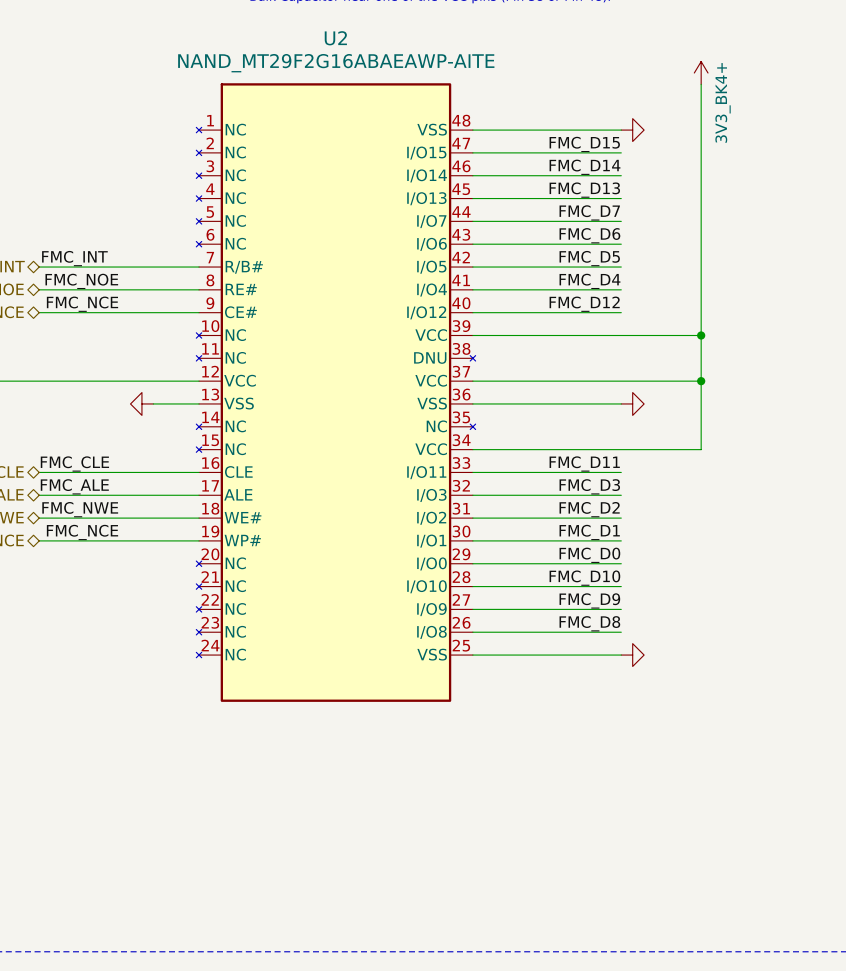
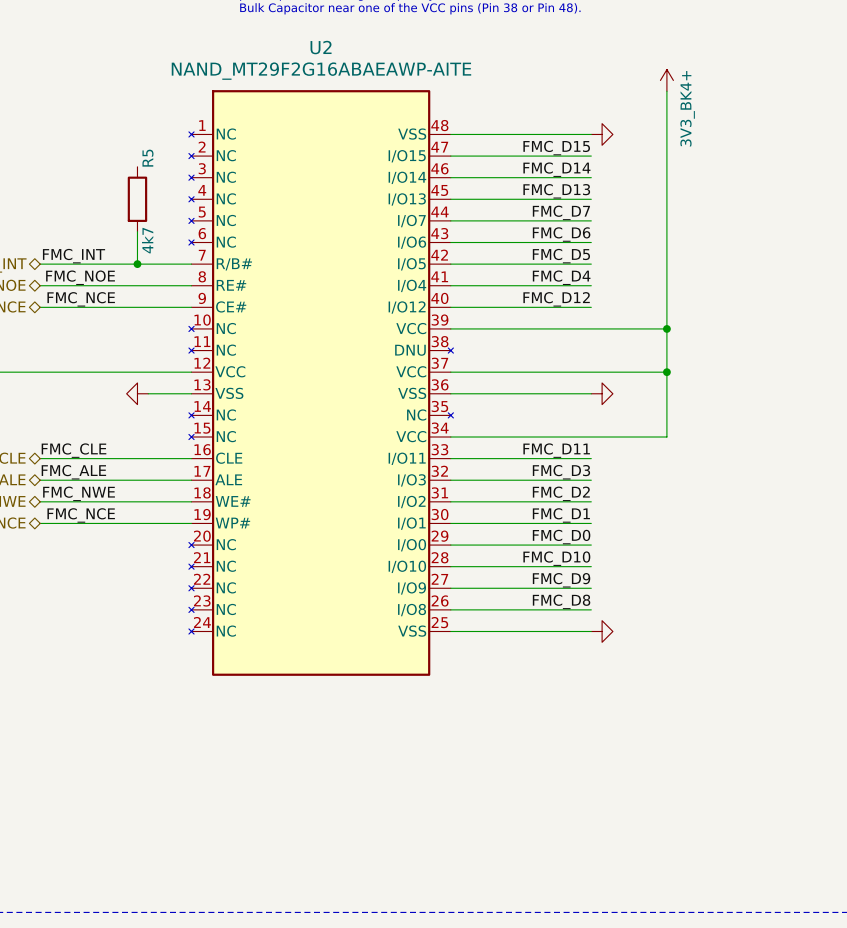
R5: none -> 4k7 (137, 199)
wire: none -> (137, 231) (137, 264)
junction: none -> (137, 264)

